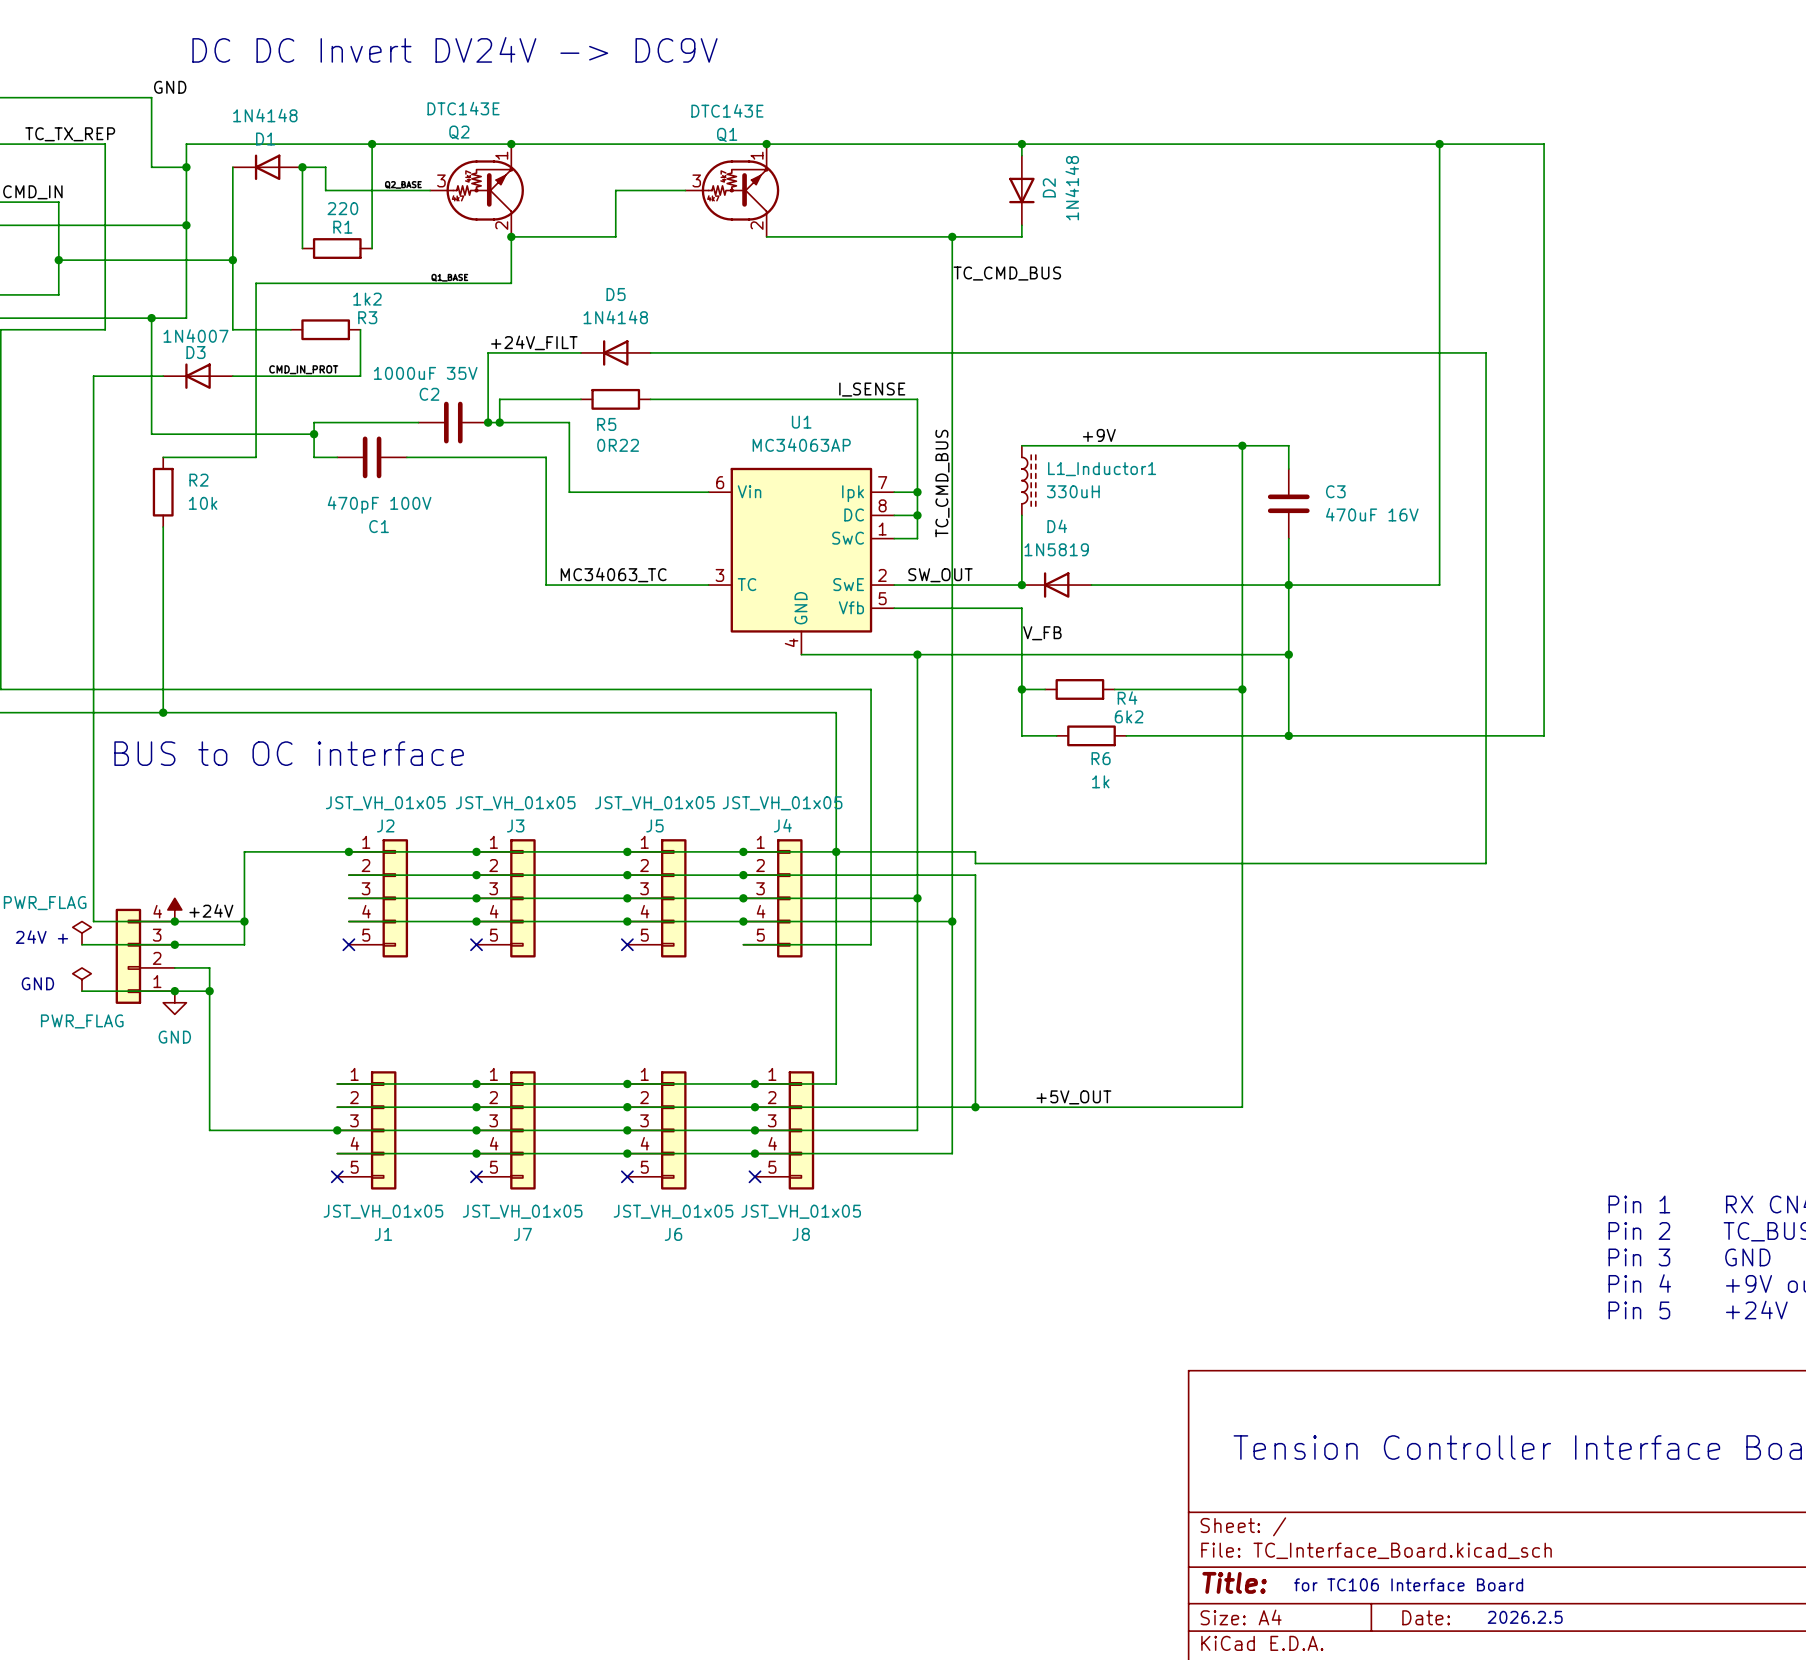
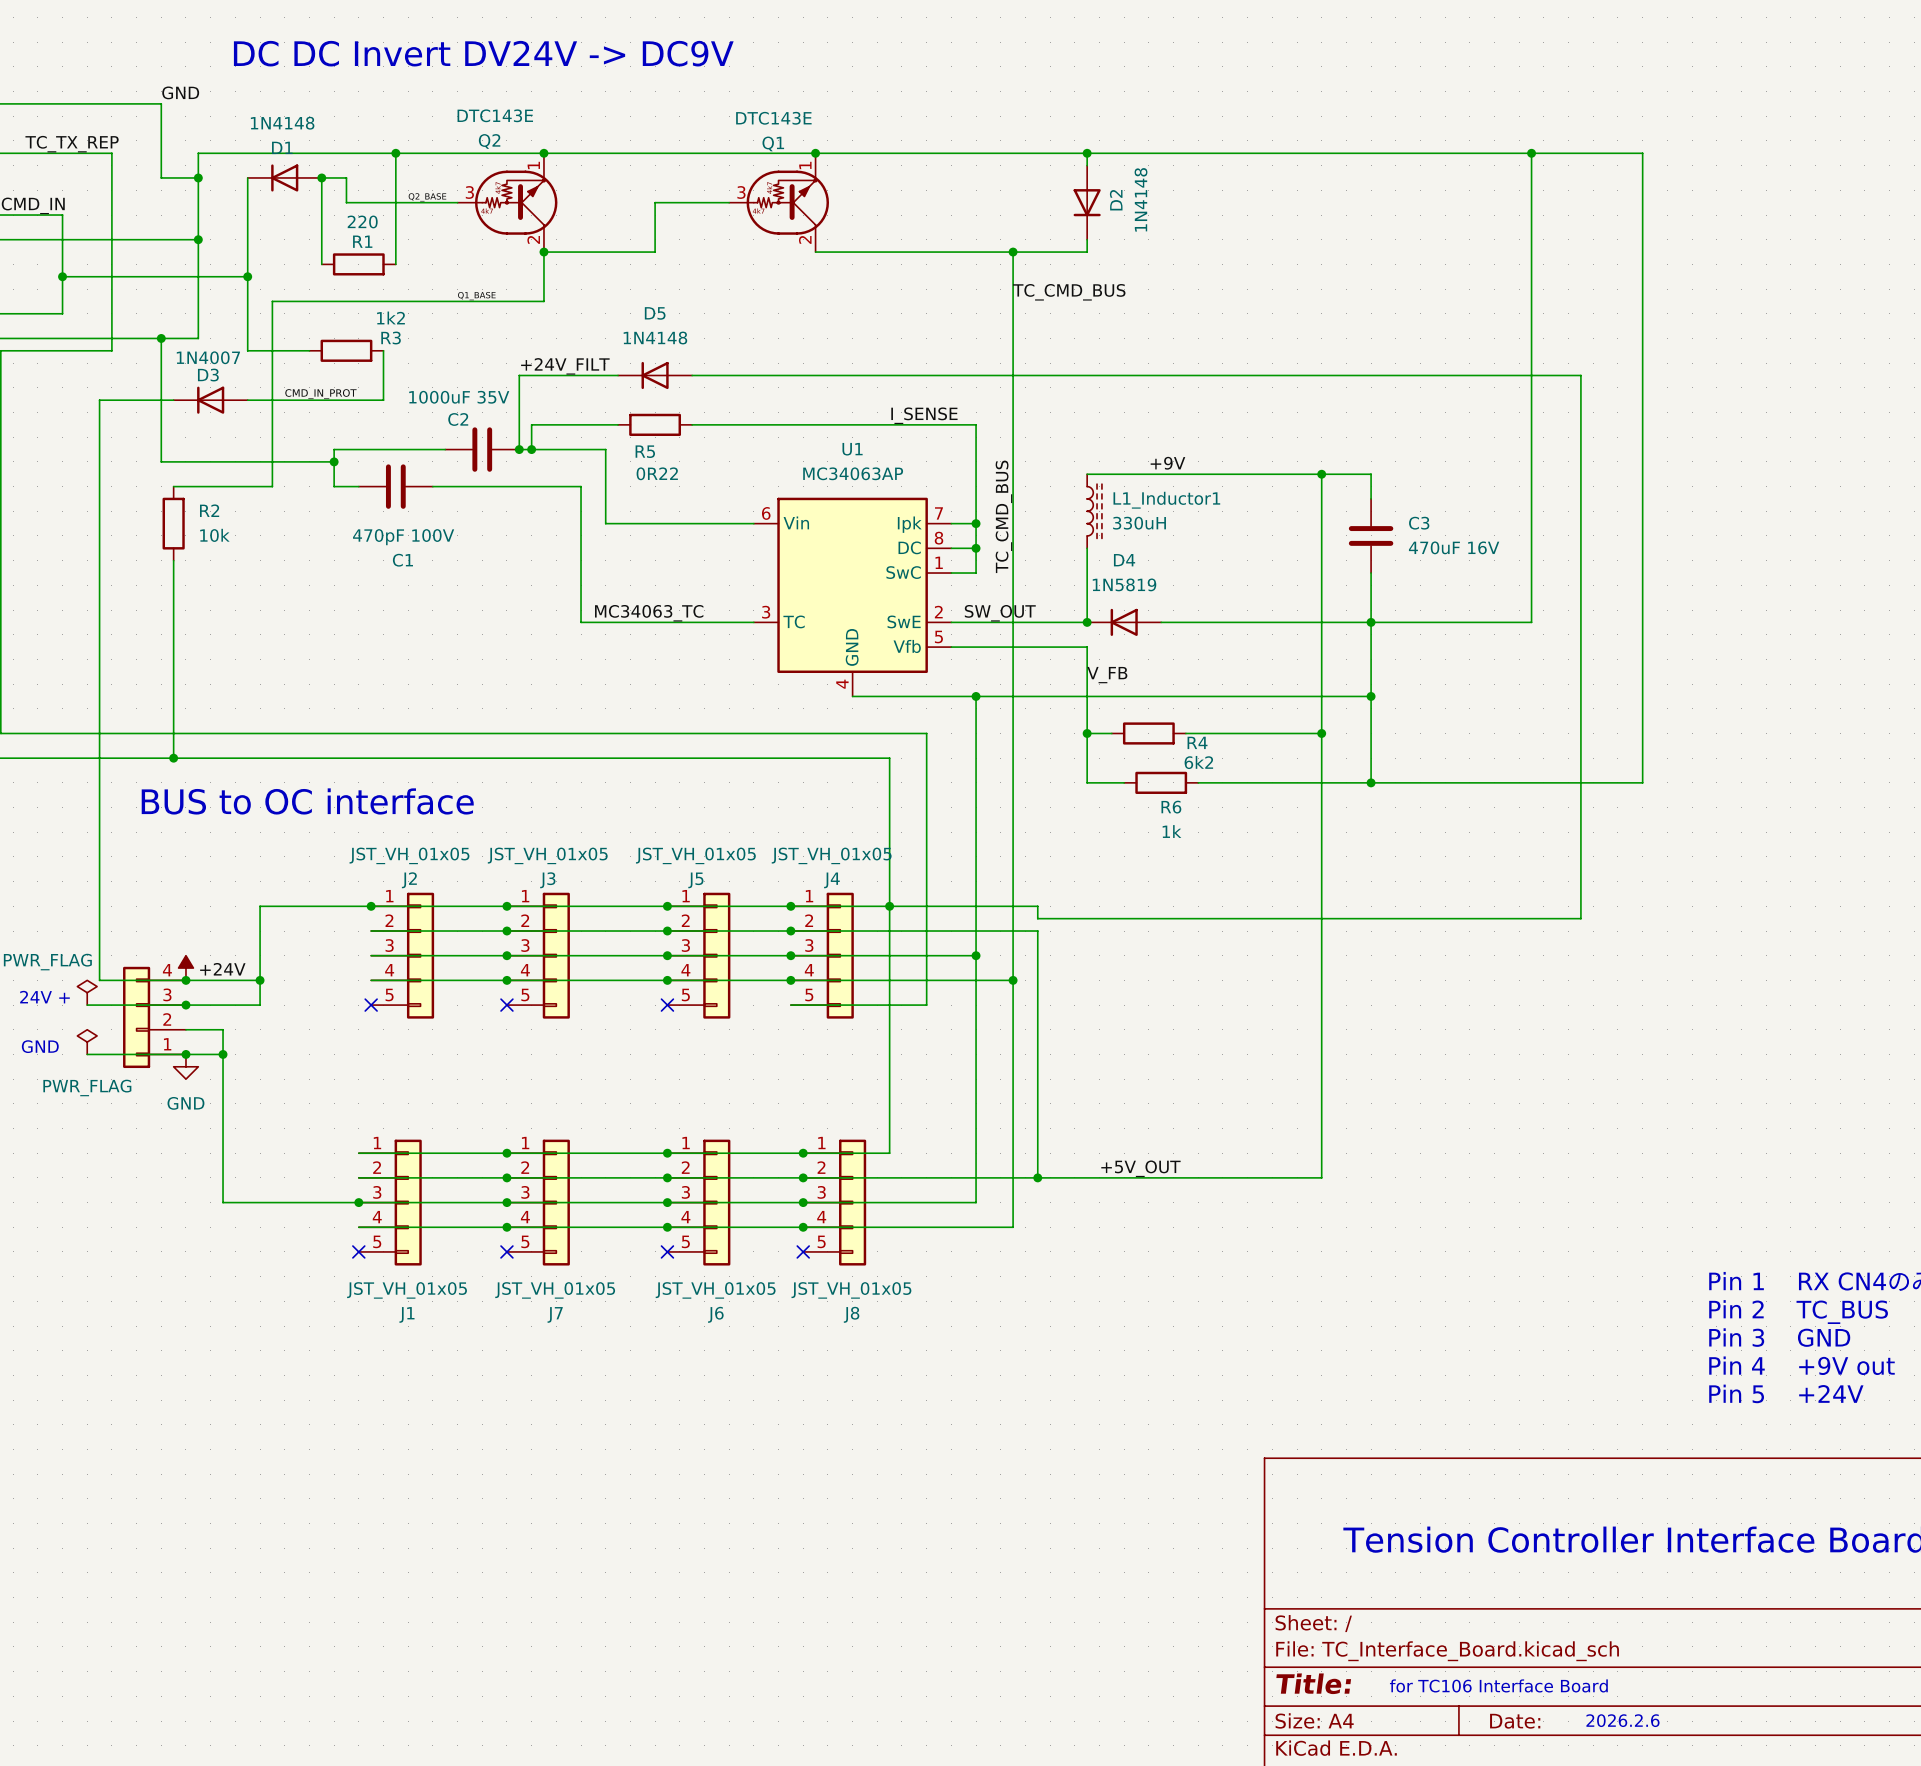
text: 2026.2.5 (1525, 1617) -> 2026.2.6 (1622, 1720)

